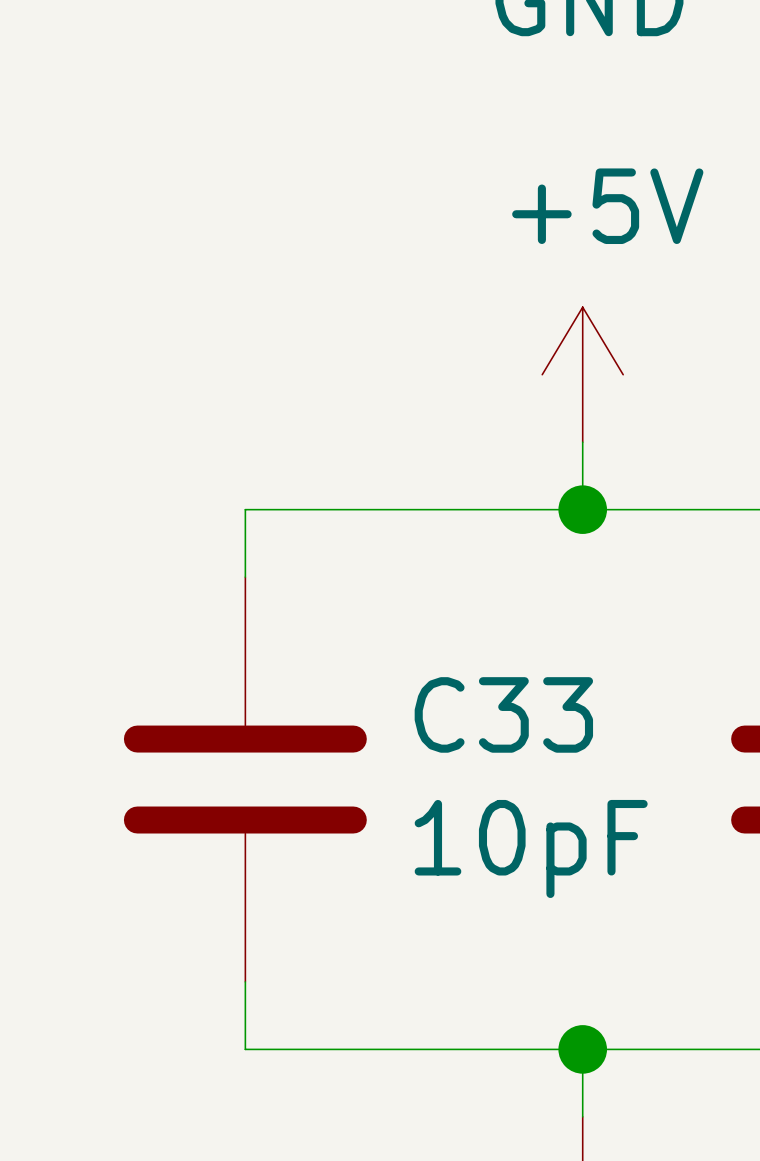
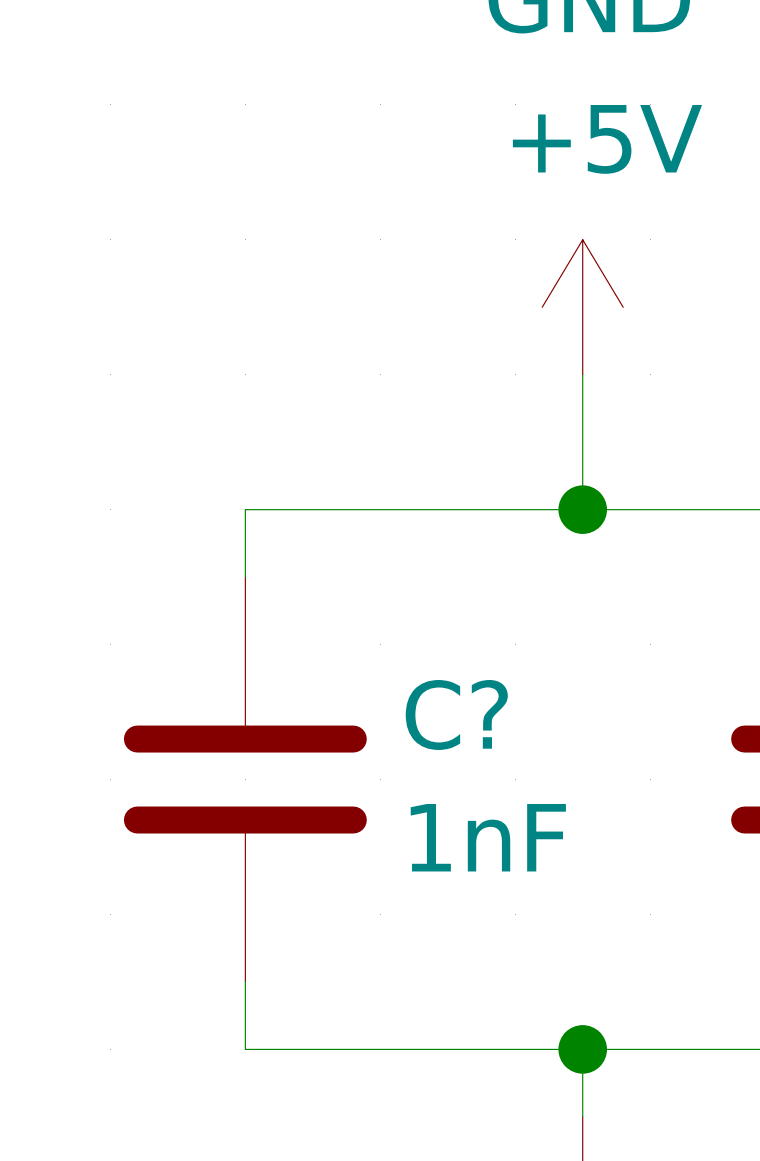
power symbol position: +5V (582, 374) -> +5V (582, 307)
C33 name: C33 (503, 714) -> C? (456, 714)
C33 value: 10pF (531, 848) -> 1nF (488, 837)

